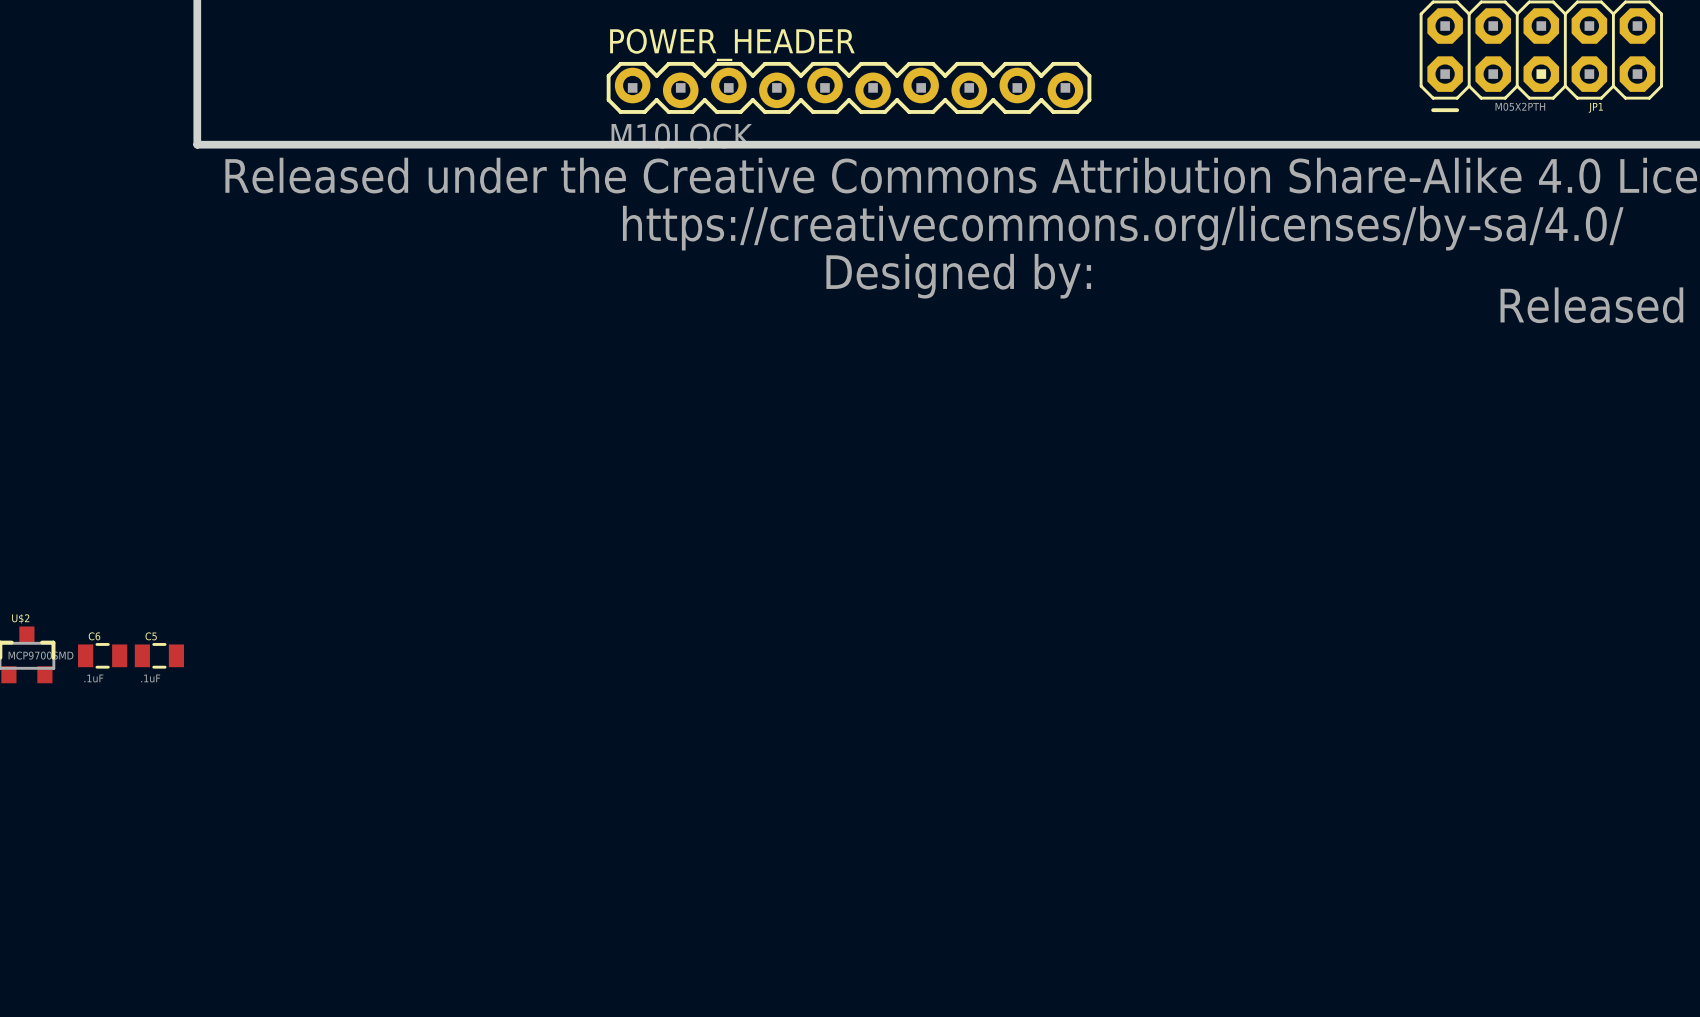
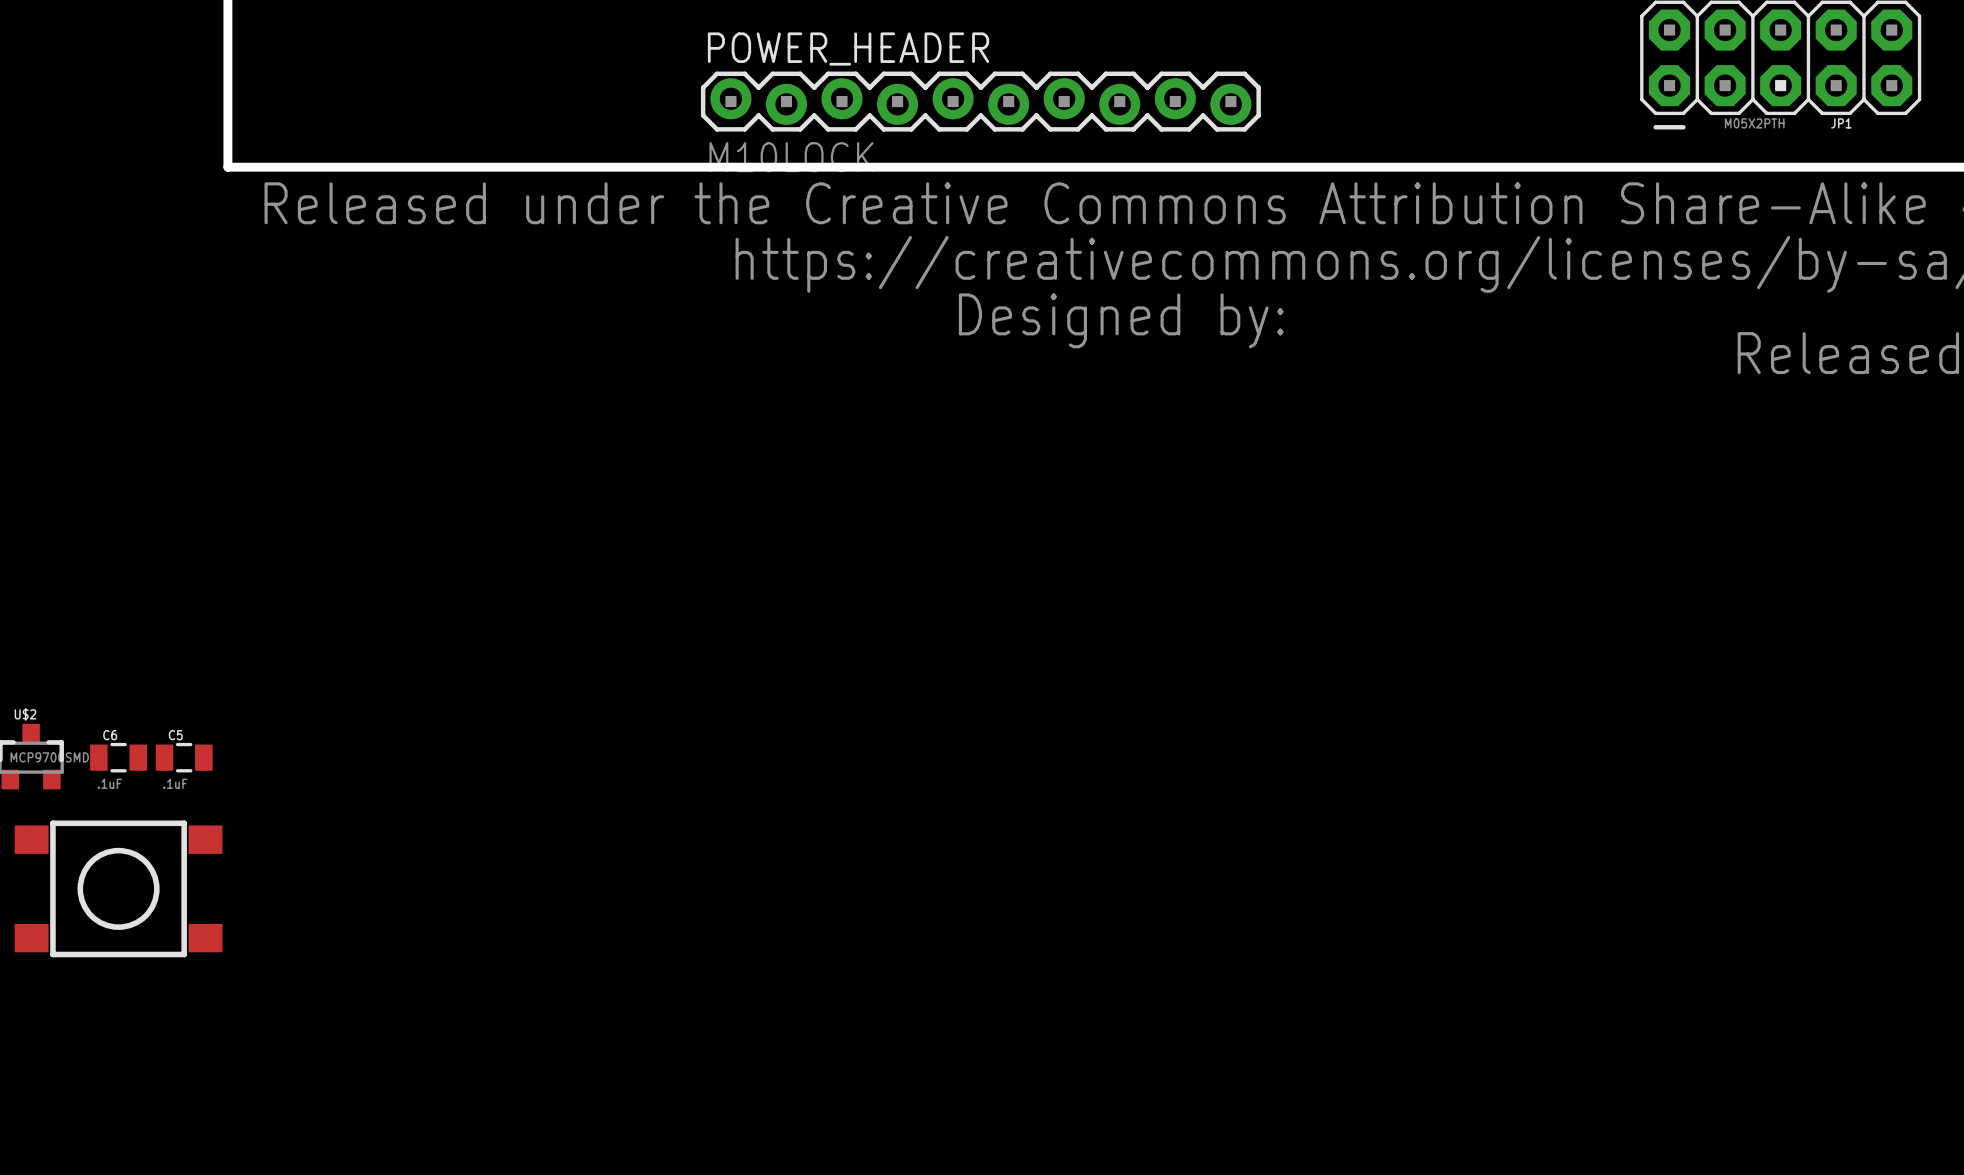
part: none -> (118, 888)

